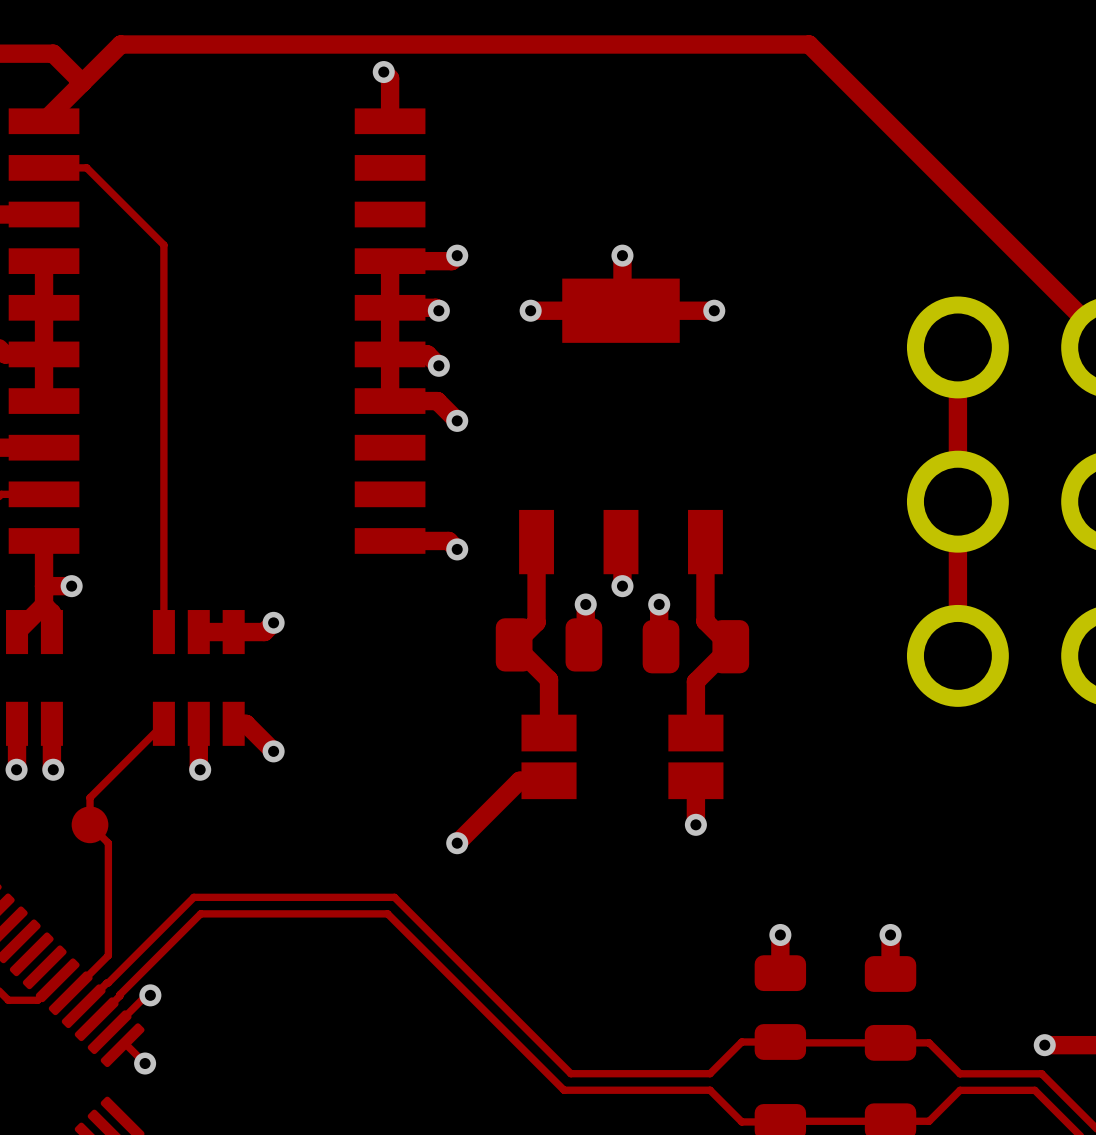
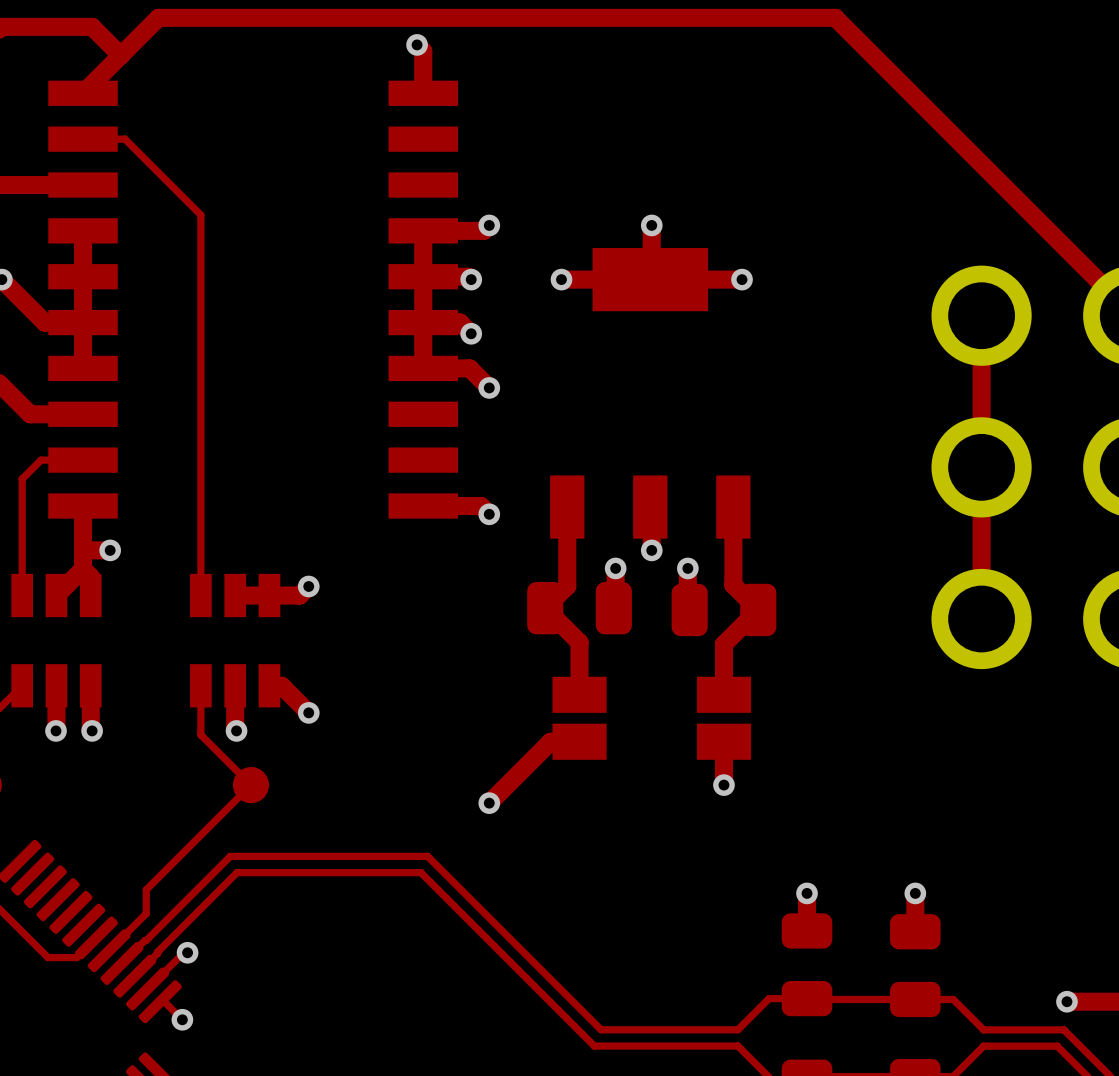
top track: (163, 723) (90, 797) (90, 824) (108, 843) (108, 931) -> (200, 685) (200, 734) (250, 785) (146, 889)
part position: (90, 824) -> (250, 785)

